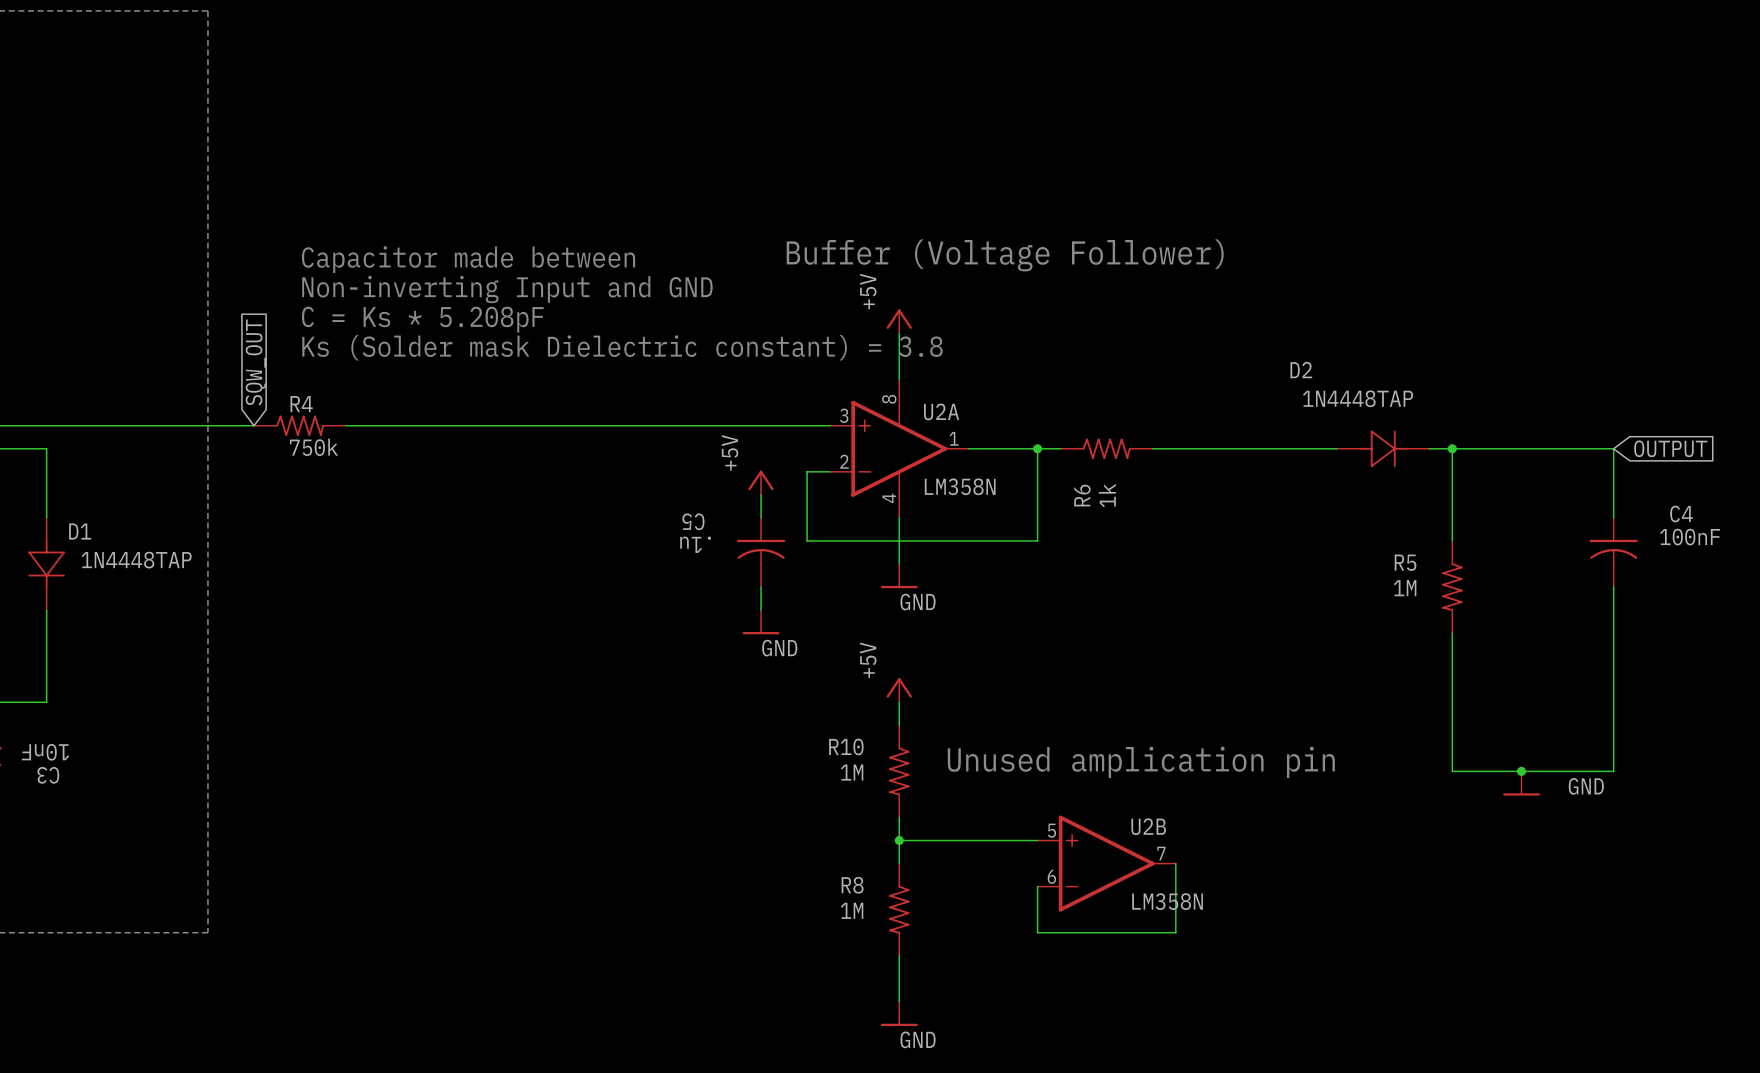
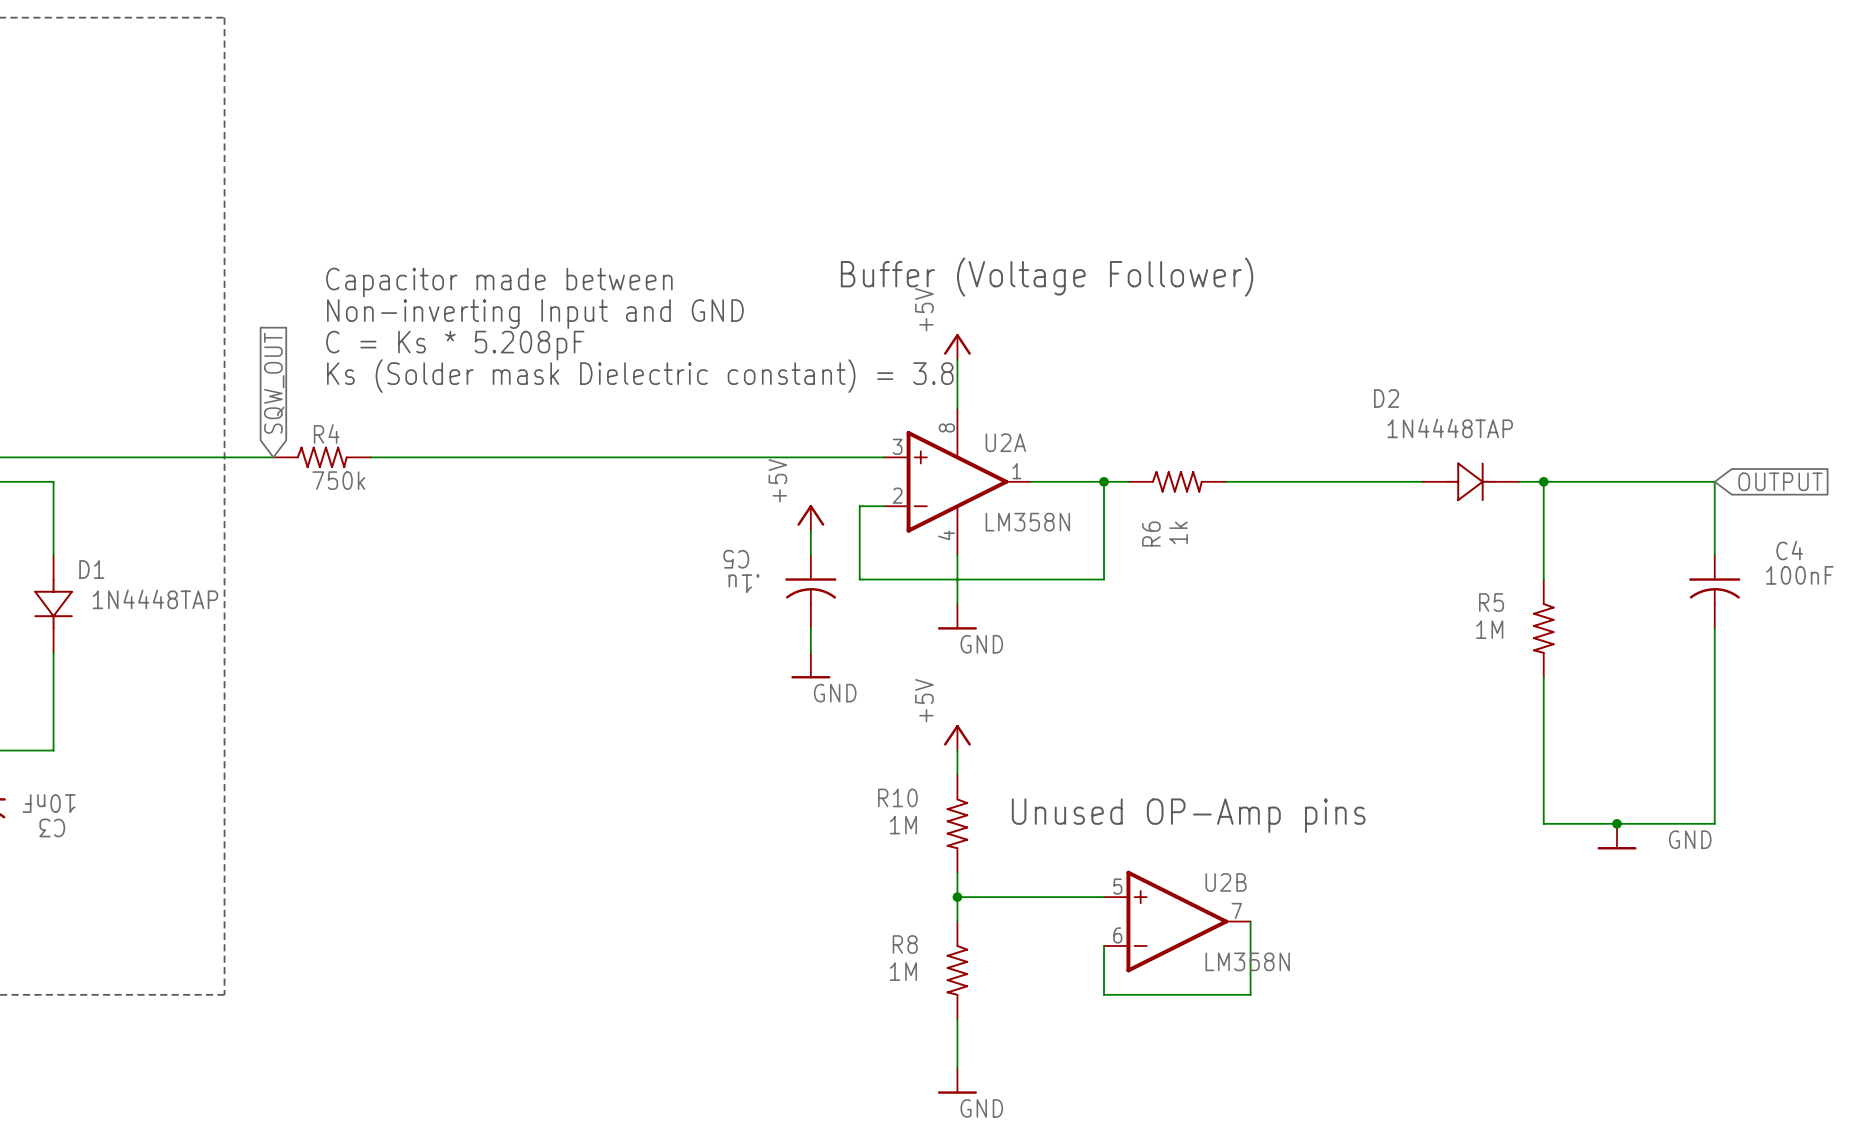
text: Unused amplication pin (1141, 762) -> Unused OP-Amp pins (1188, 815)

